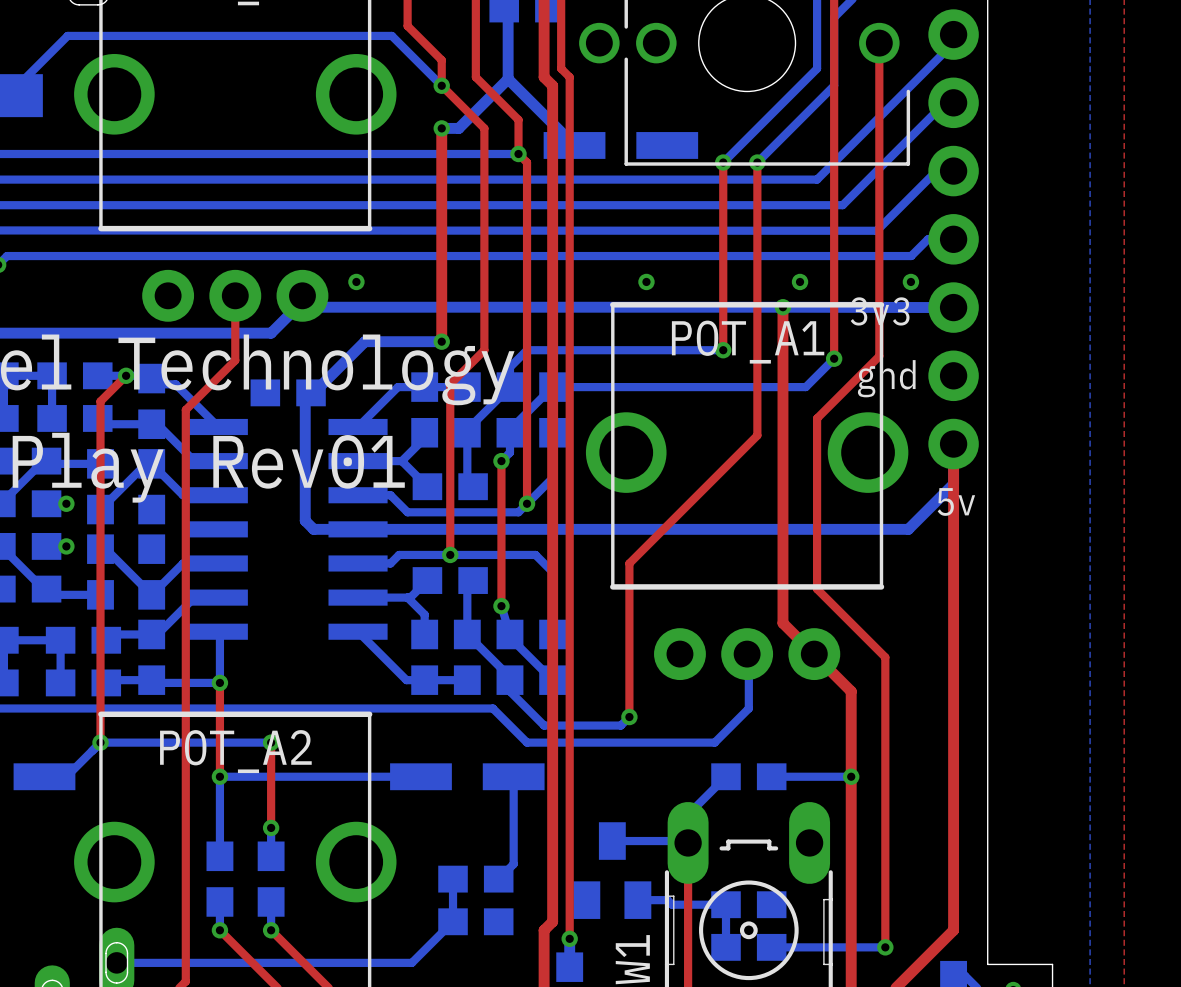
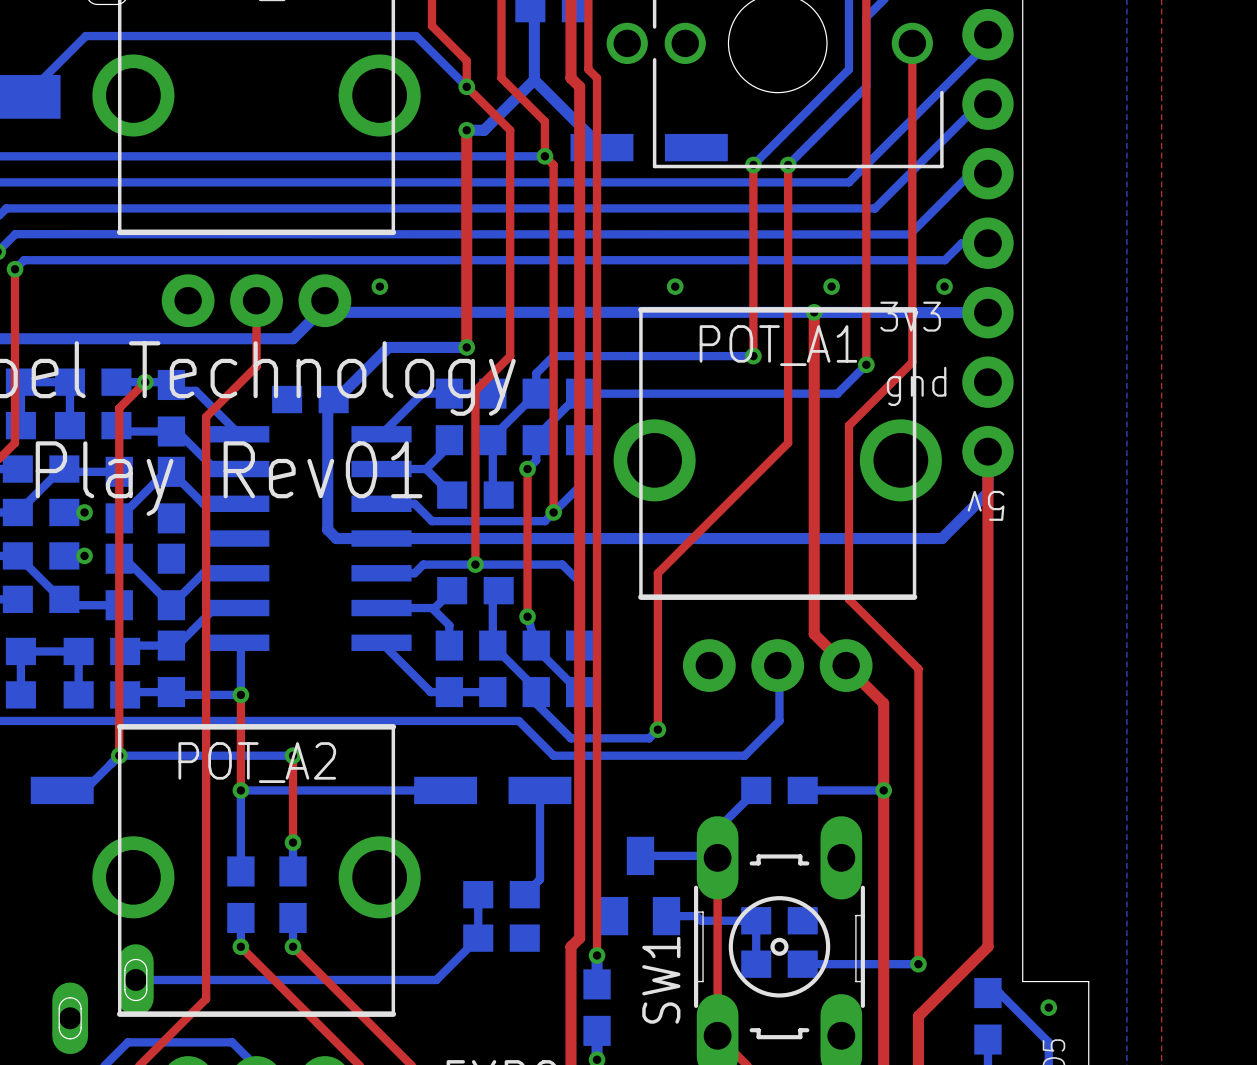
text rotation: 0° (956, 501) -> 180° (986, 505)

